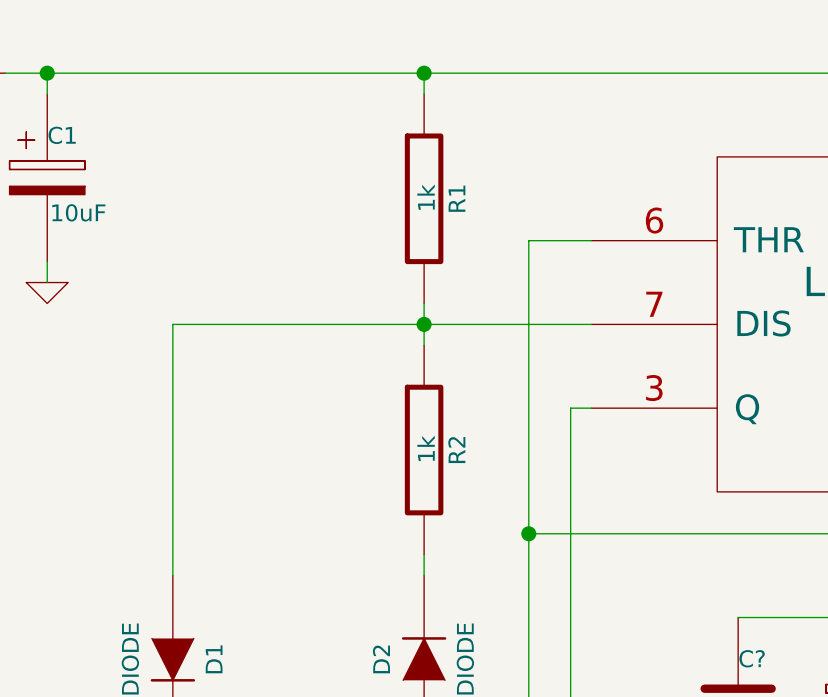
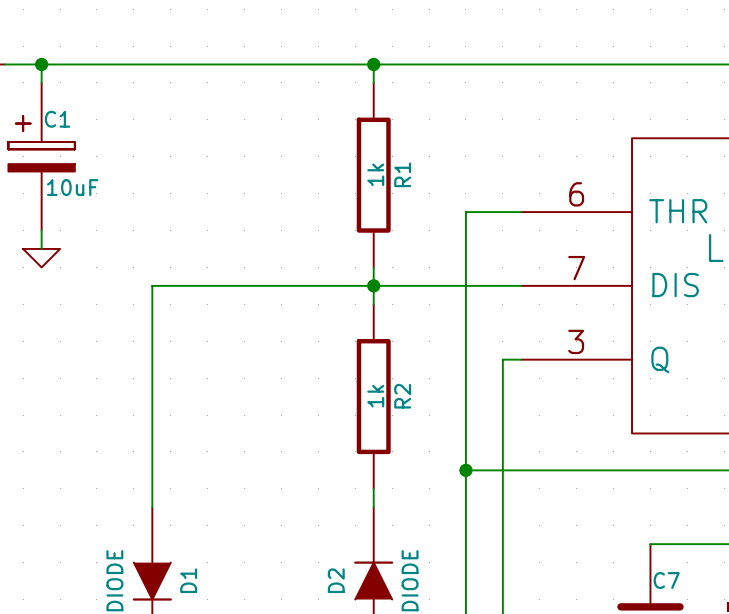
C? name: C? (752, 658) -> C7 (666, 580)

